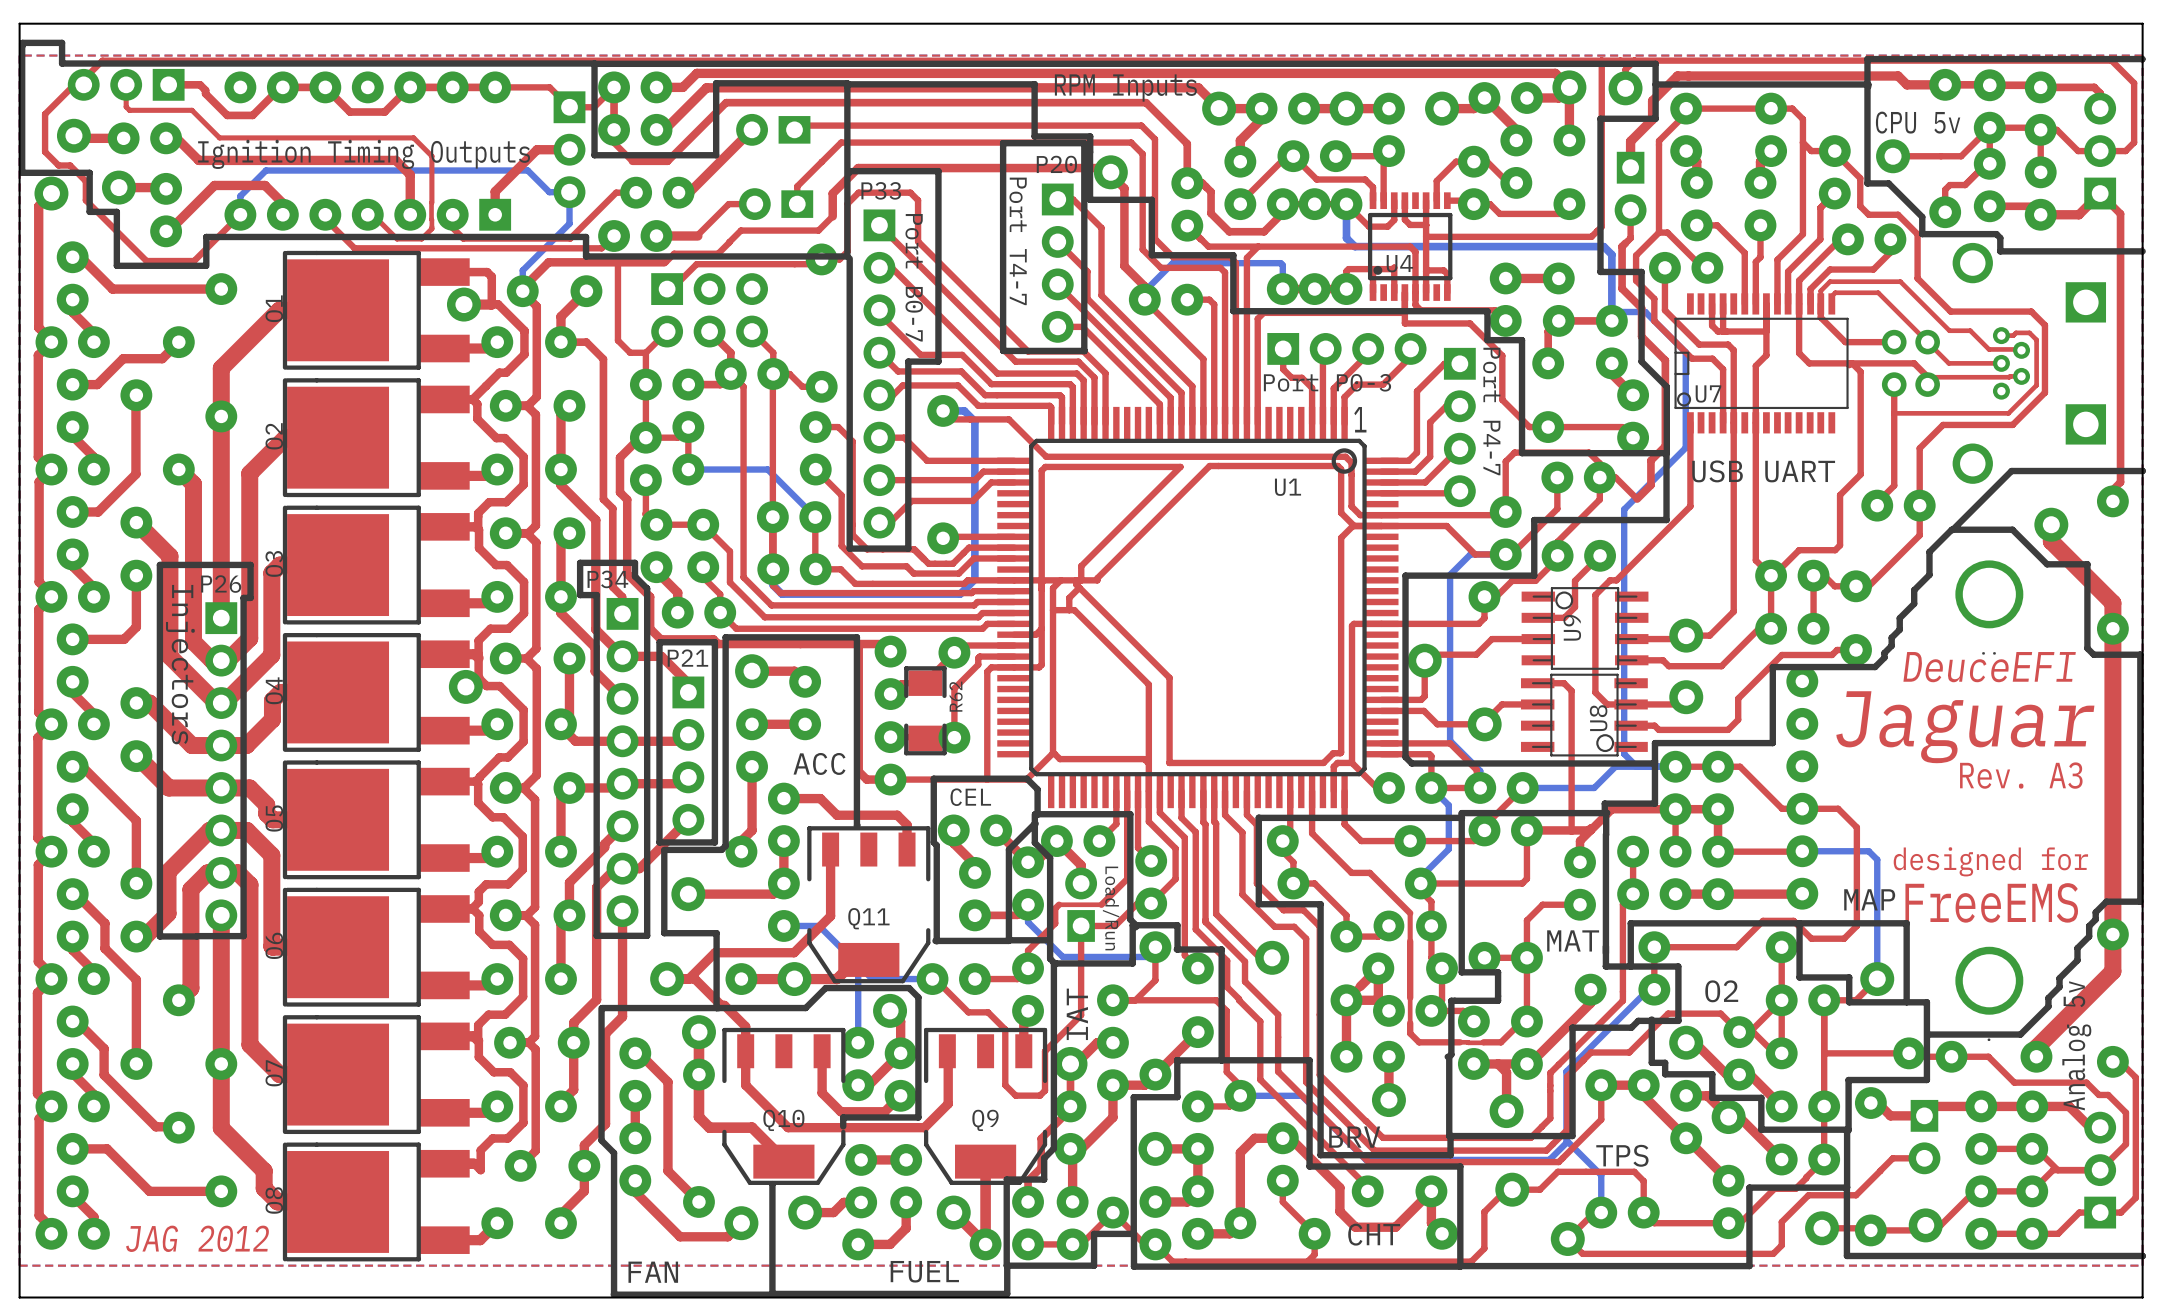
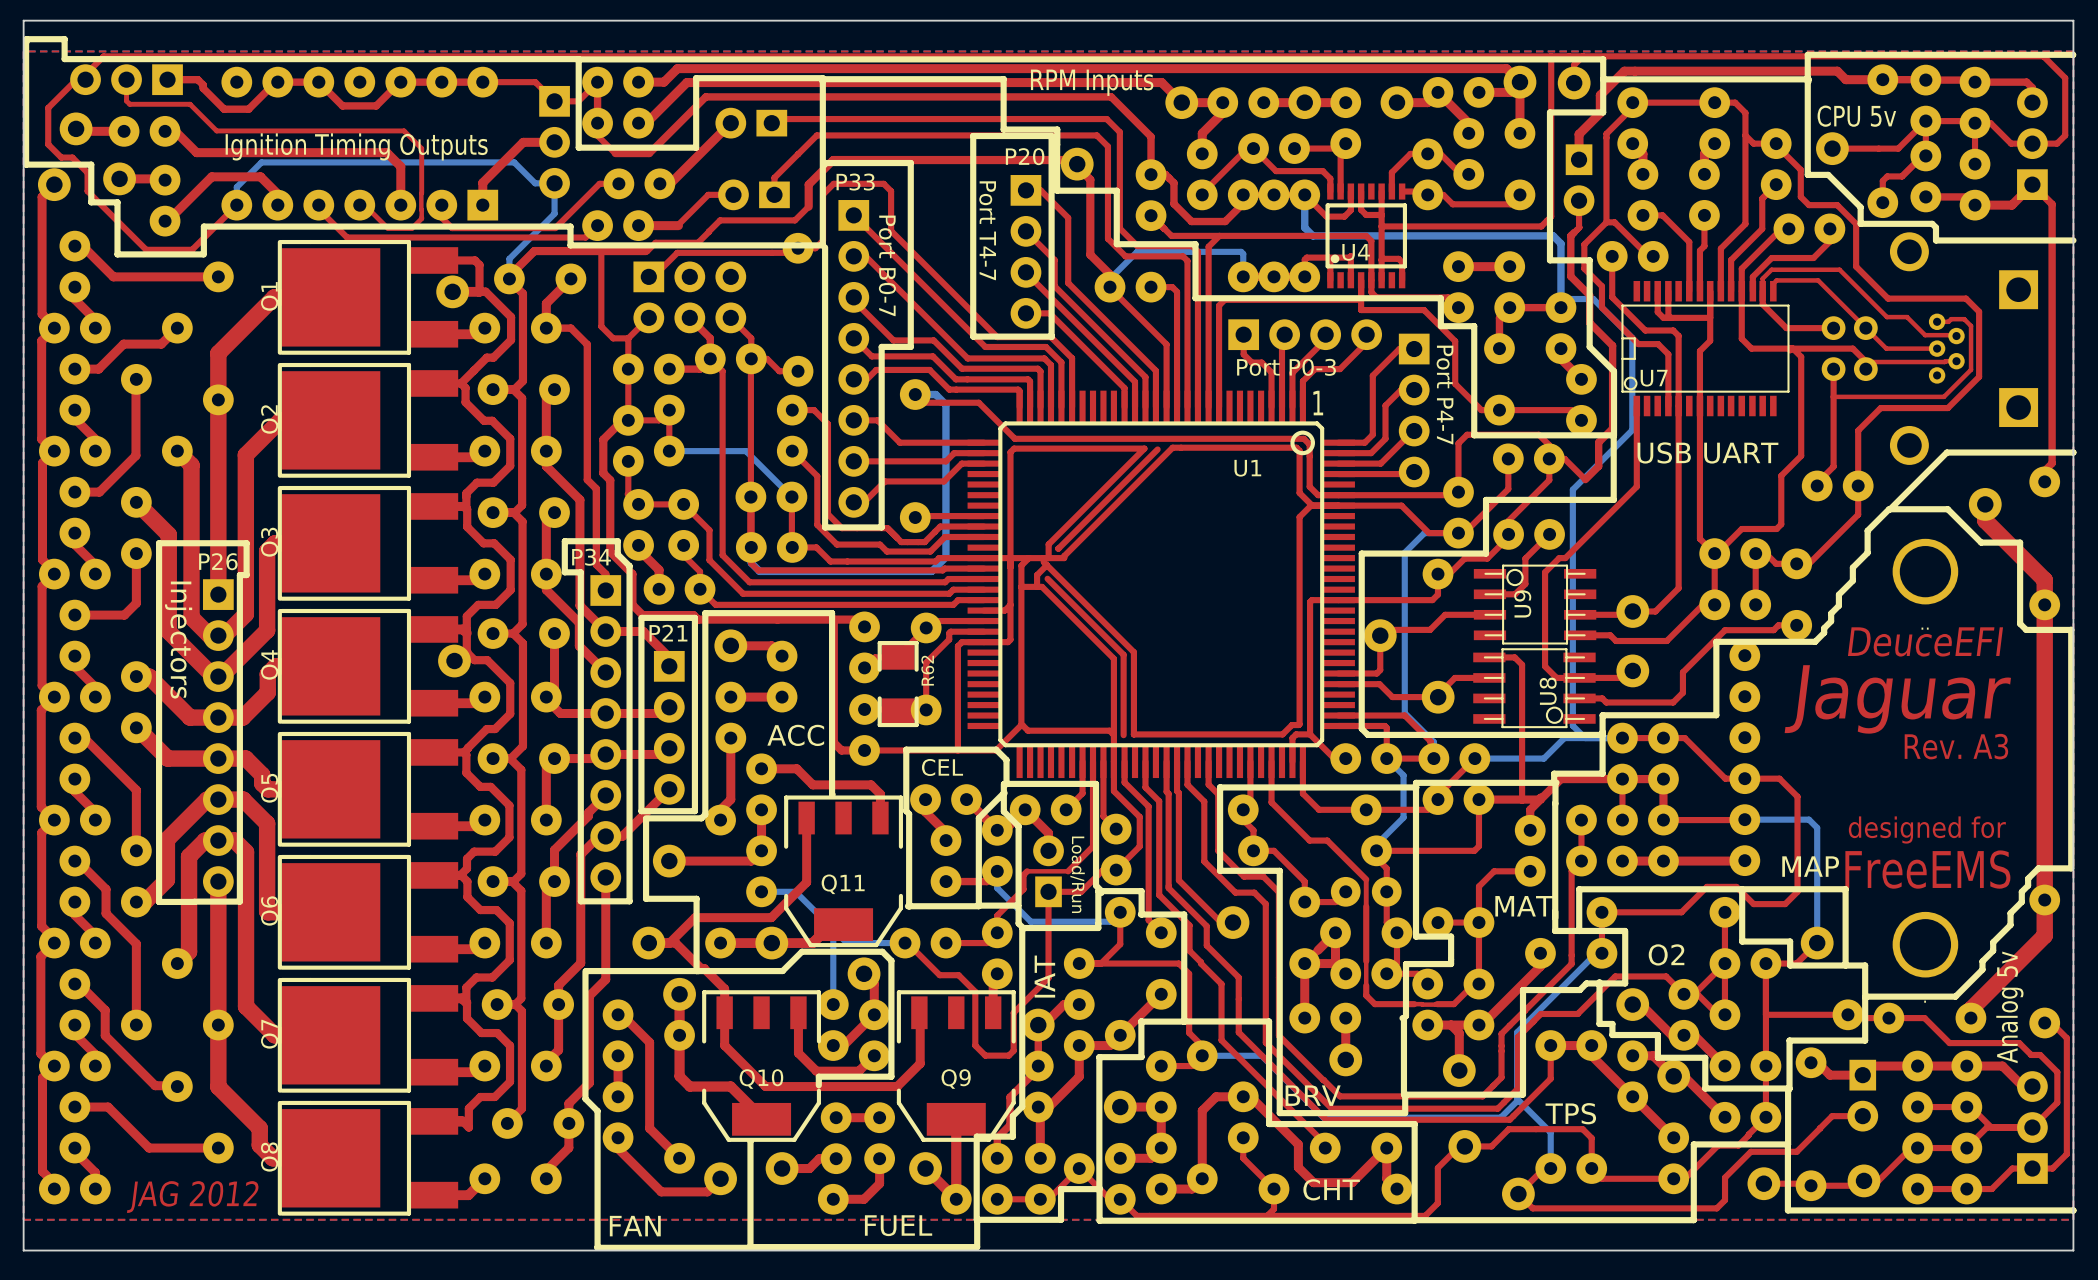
top track: none -> (1157, 449) (1058, 548)
top track: none -> (1047, 578) (1123, 654) (1123, 735)

